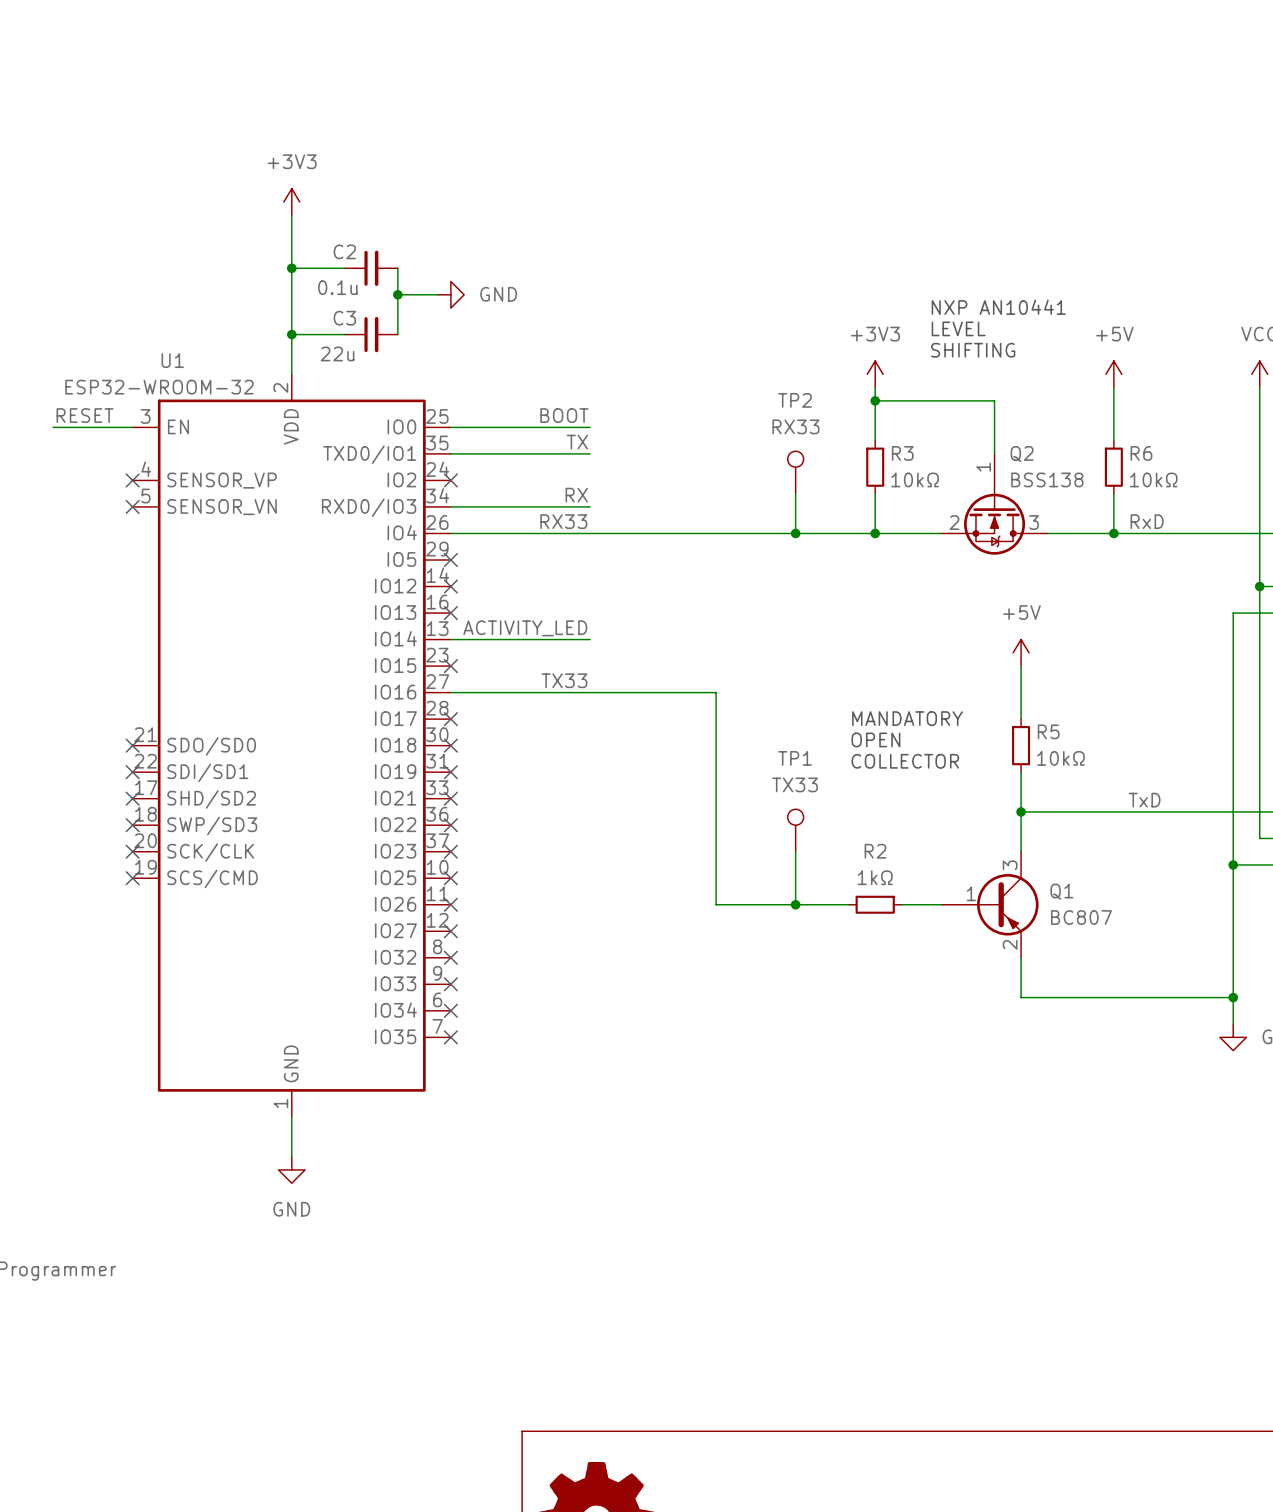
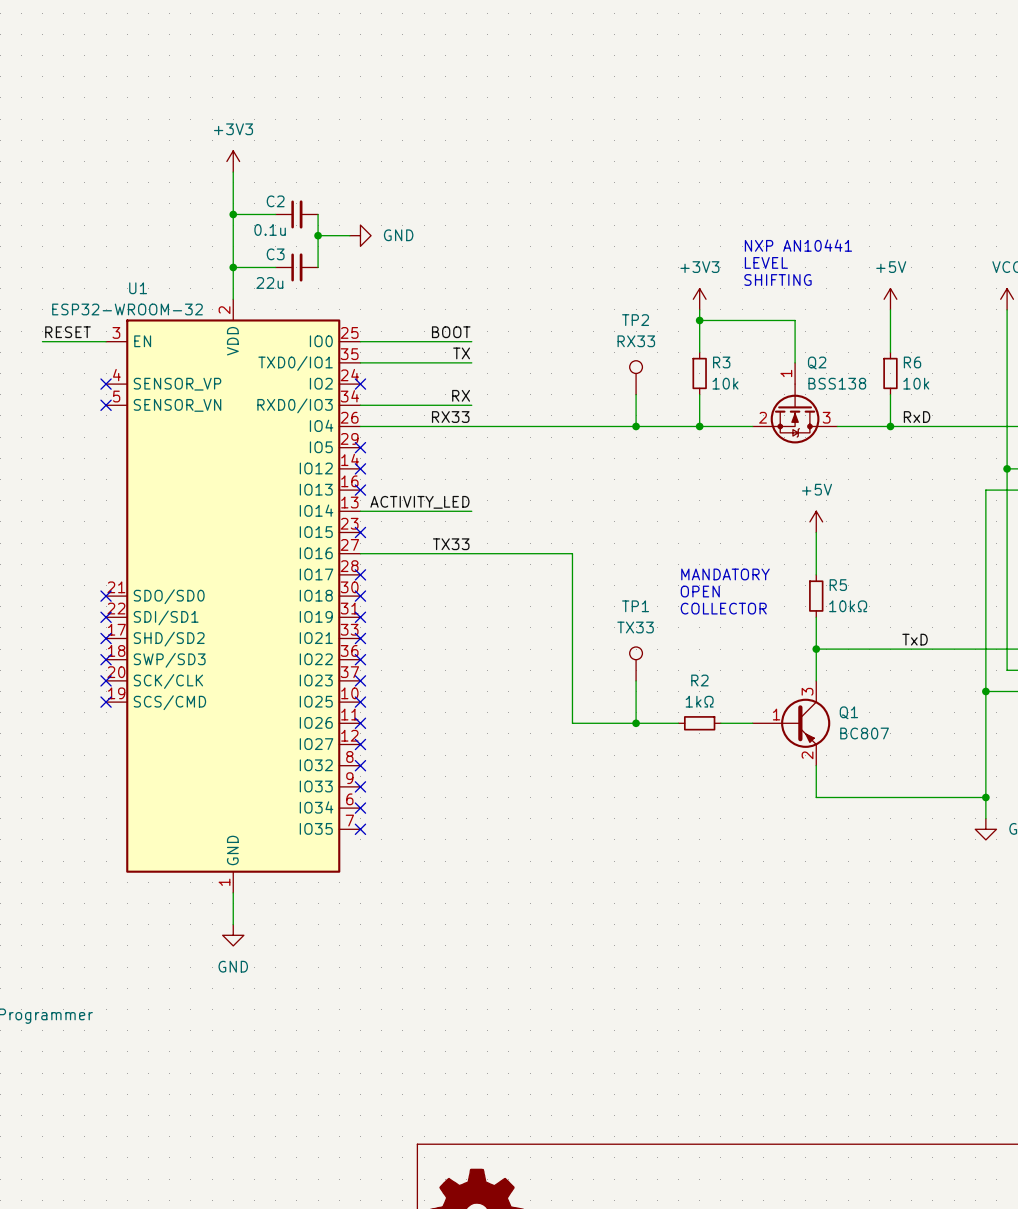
R3 value: 10kΩ (915, 479) -> 10k (725, 383)
R6 value: 10kΩ (1153, 479) -> 10k (916, 383)

